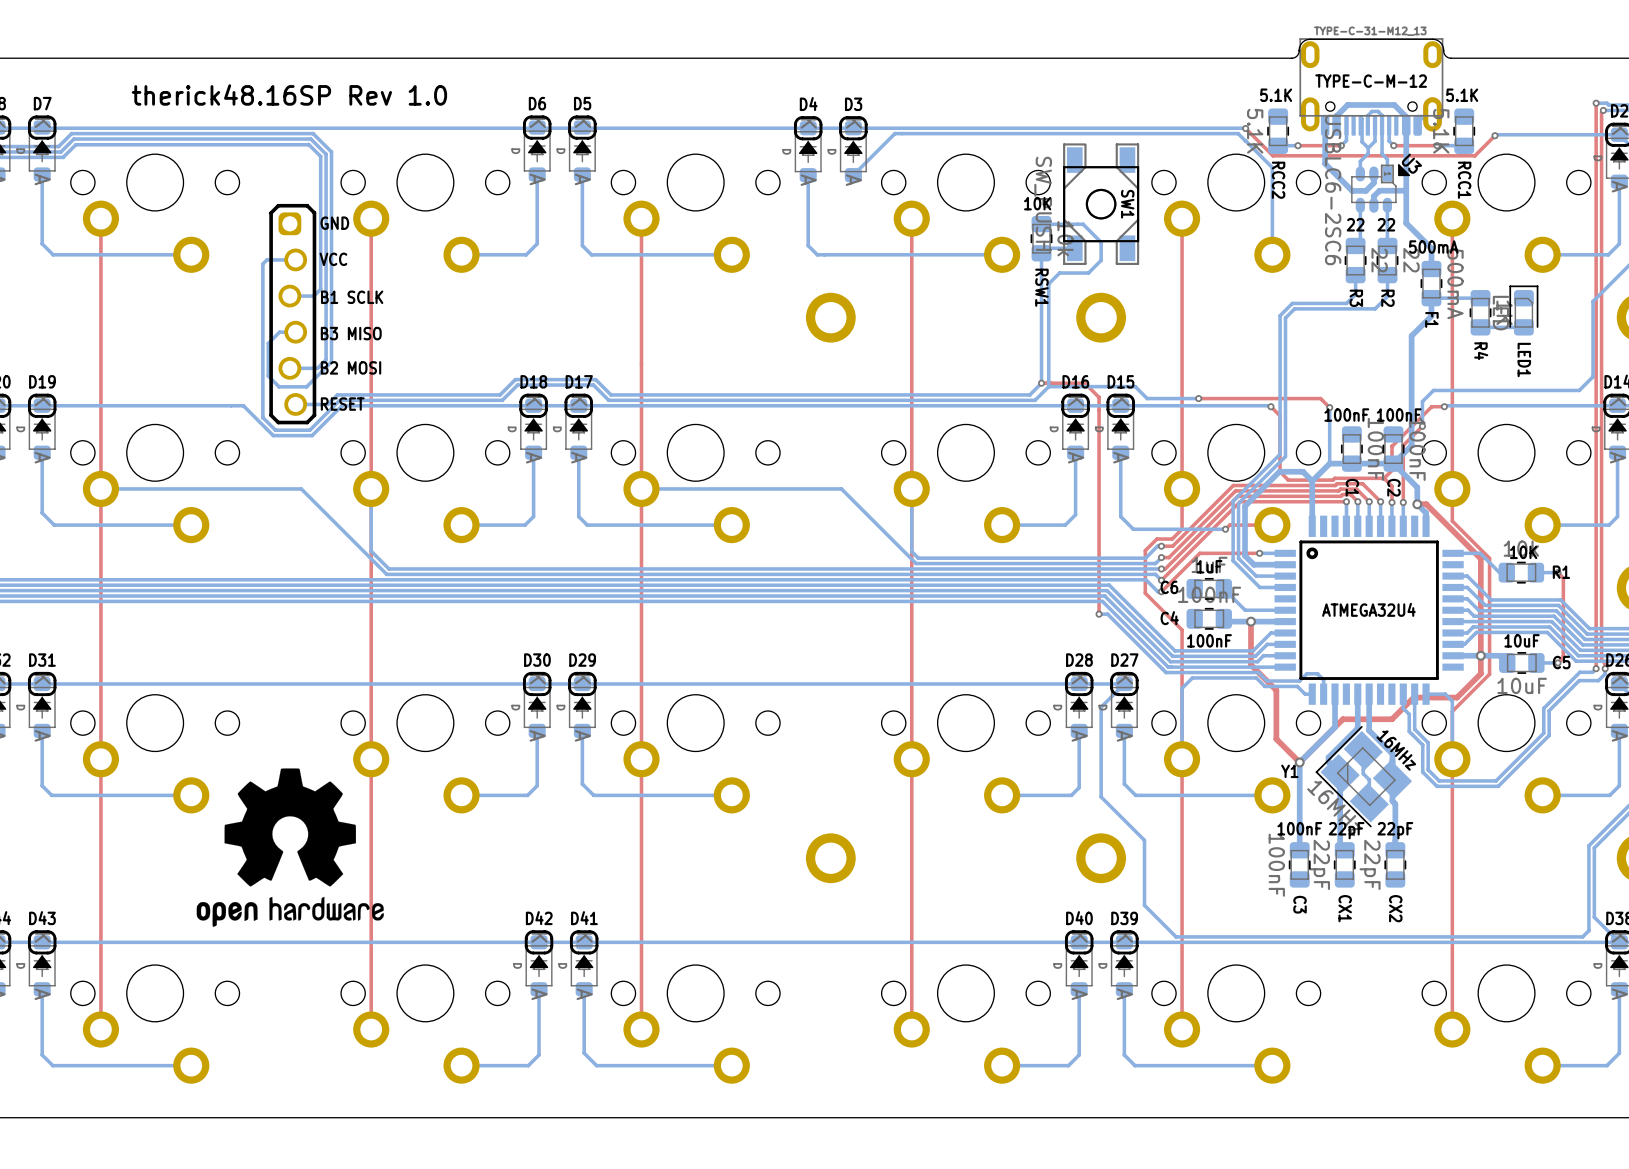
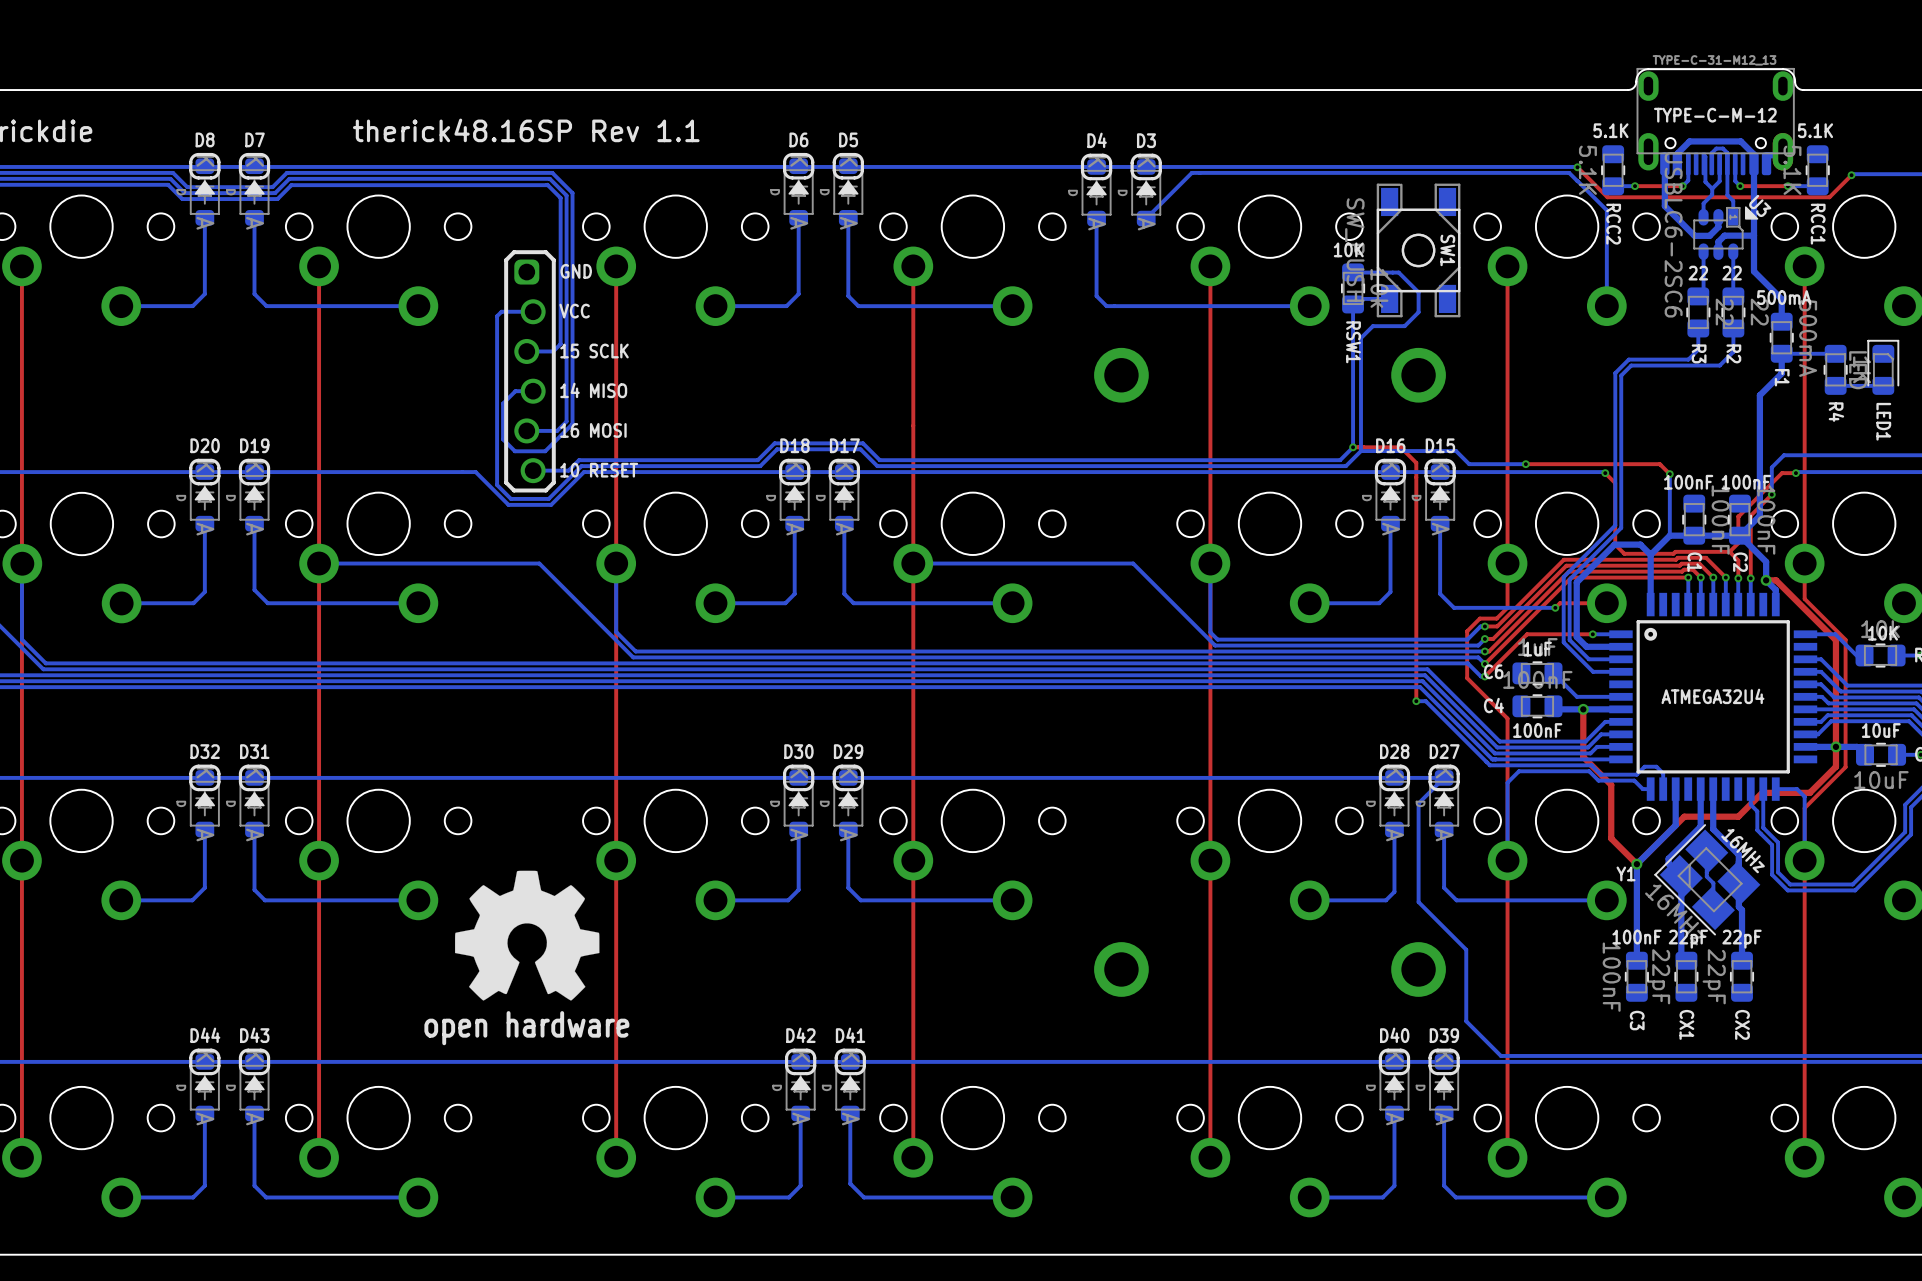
text: therick48.16SP Rev 1.0 (289, 94) -> therick48.16SP Rev 1.1 (526, 130)
part text: none -> 15 SCLK (594, 351)
part text: B1 SCLK (352, 297) -> none
part text: none -> 14 MISO (593, 390)
part text: B3 MISO (351, 333) -> none
part text: B2 MOSI (351, 367) -> 16 MOSI (593, 430)
part text: RESET (342, 404) -> 10 RESET (599, 470)
drawing: [196, 768, 384, 927] -> none
text: none -> open hardware (526, 1028)

